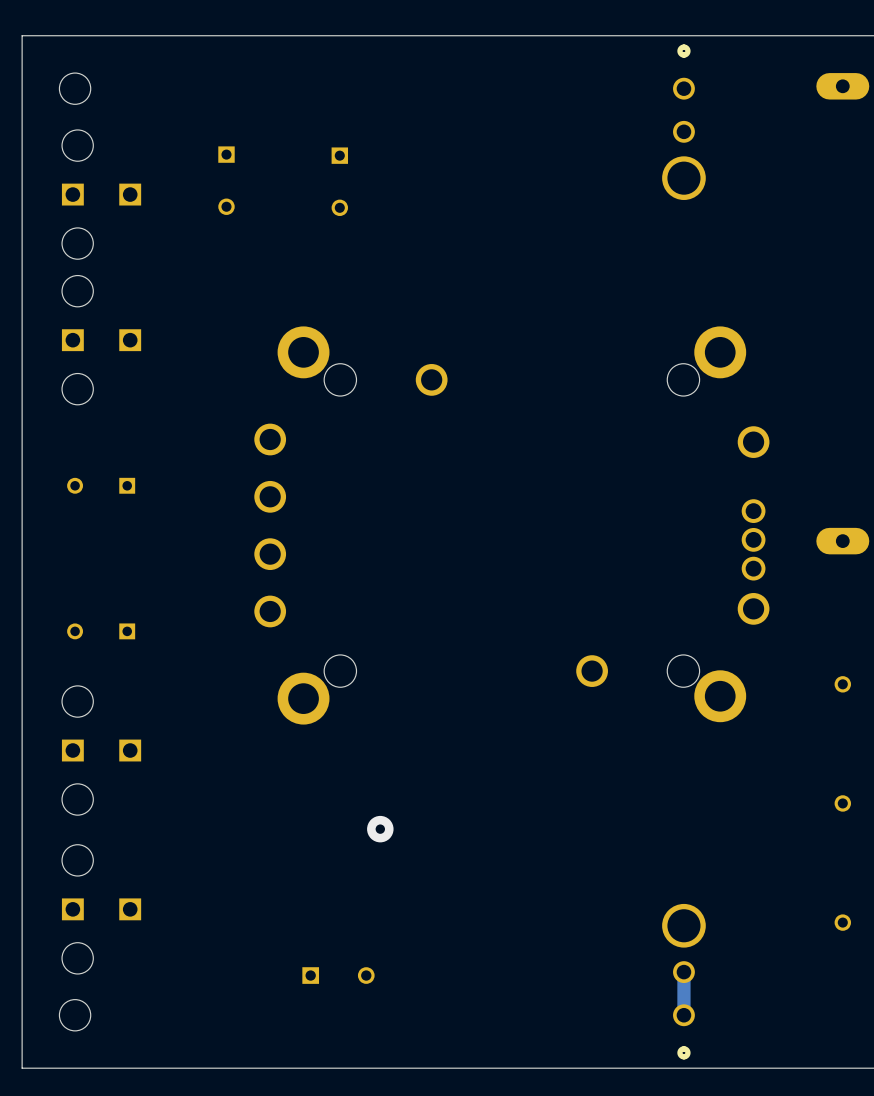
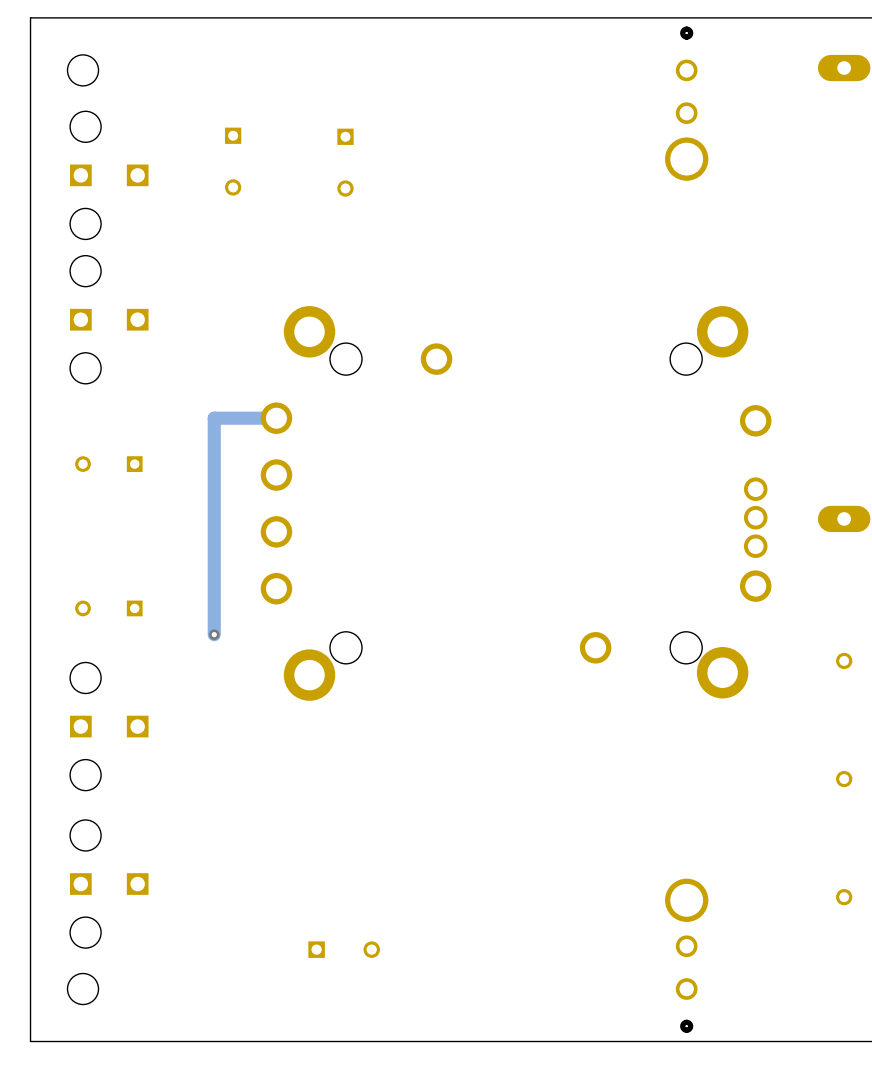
track: none -> (276, 418) (214, 418) (214, 634)
via: none -> (214, 634)
via: (380, 829) -> none
track: (683, 972) (683, 1015) -> none

